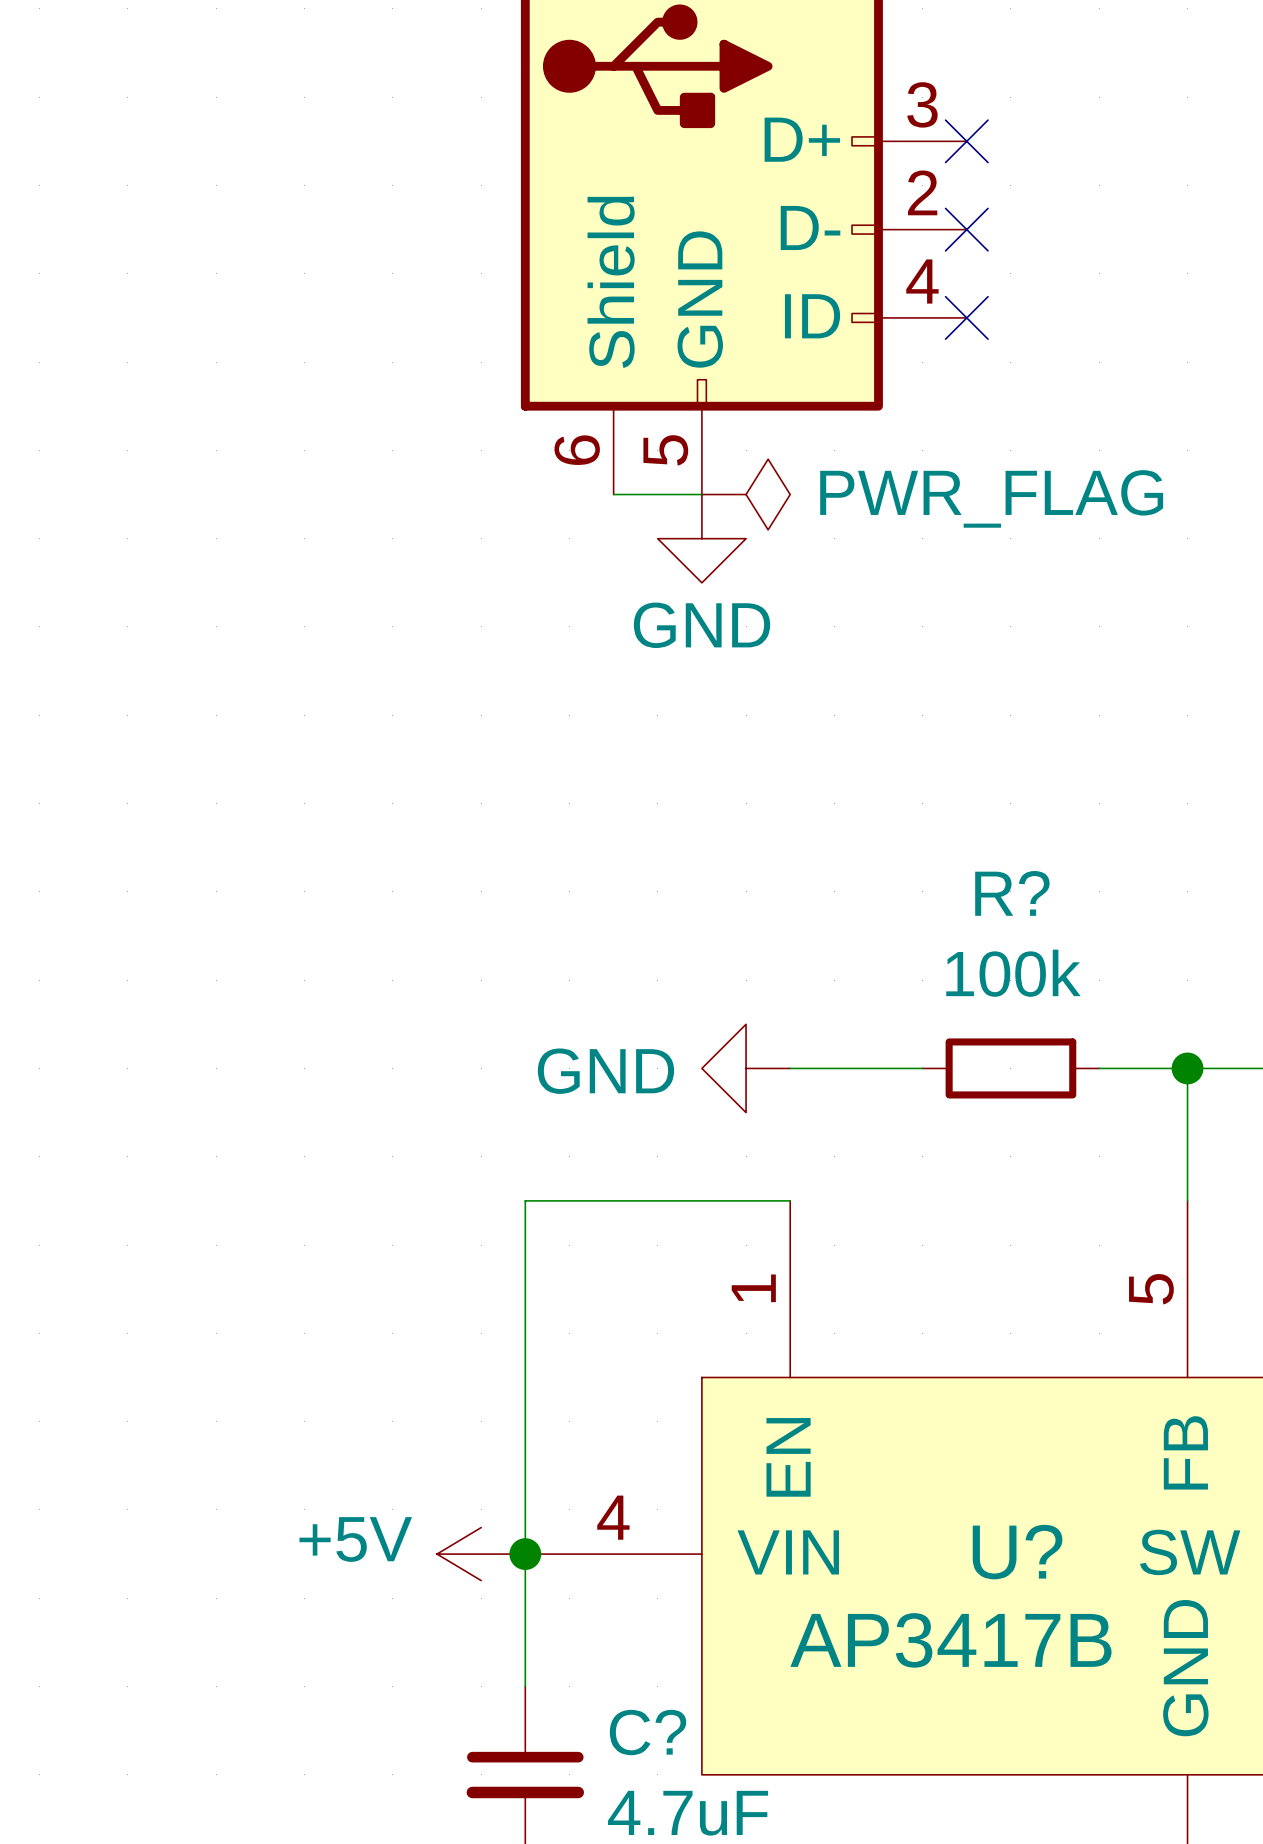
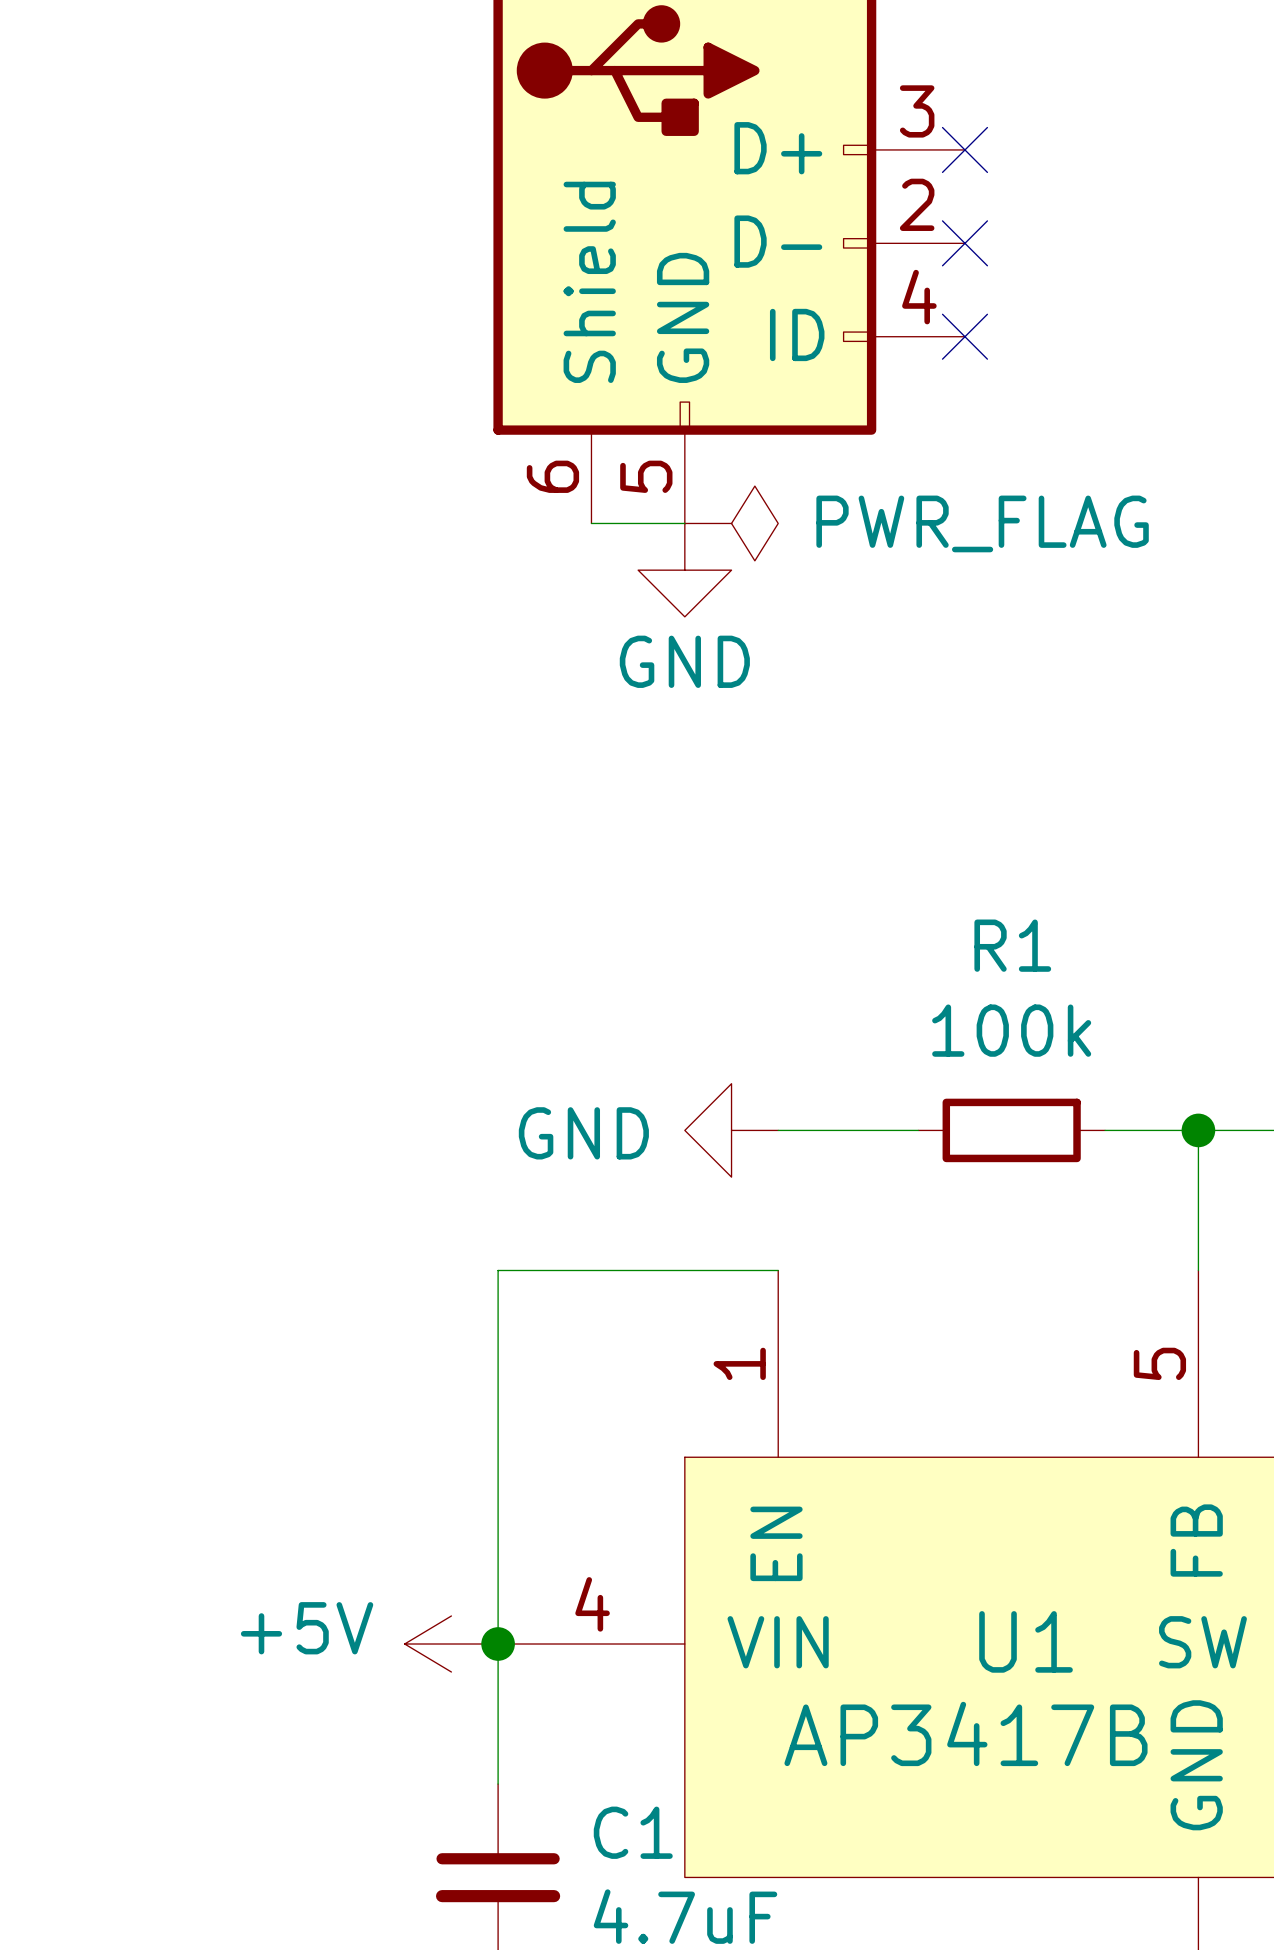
R? name: R? (1012, 893) -> R1 (1012, 945)
U? name: U? (1017, 1552) -> U1 (1026, 1641)
C? name: C? (648, 1732) -> C1 (633, 1832)

